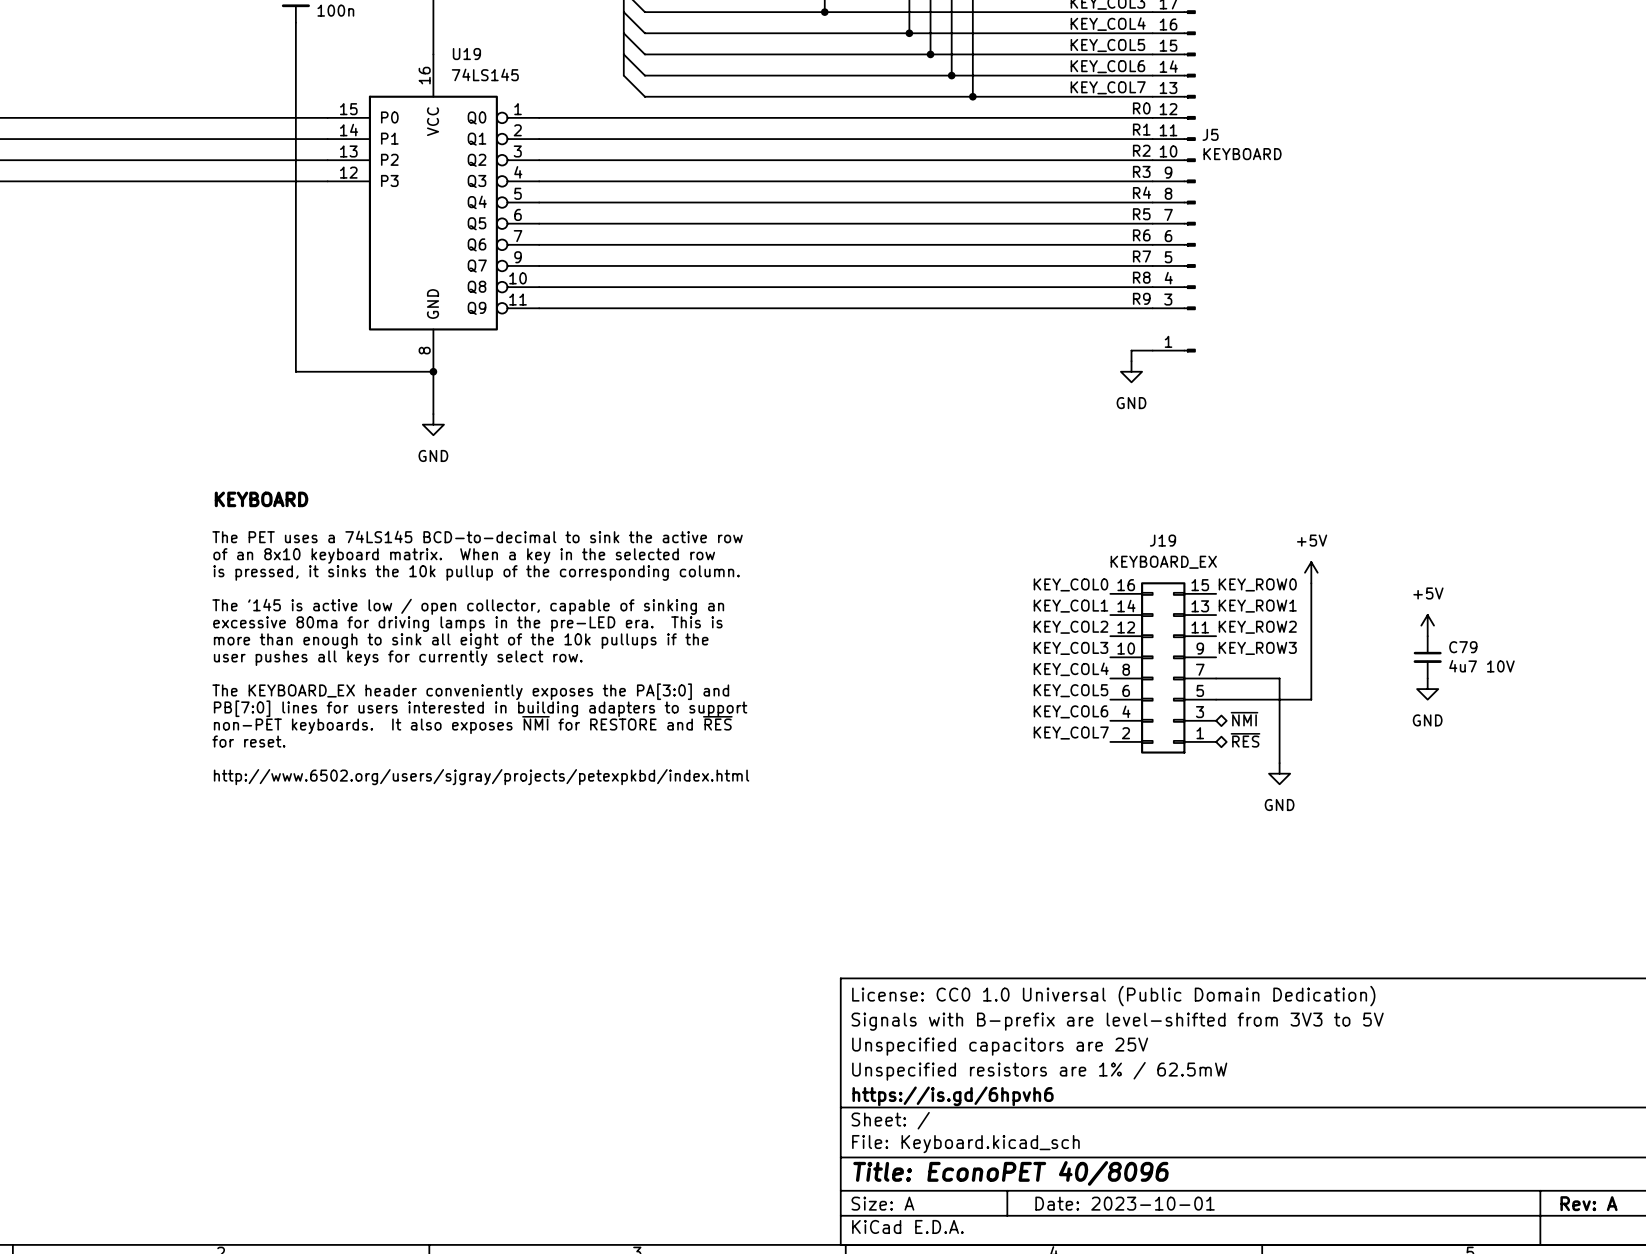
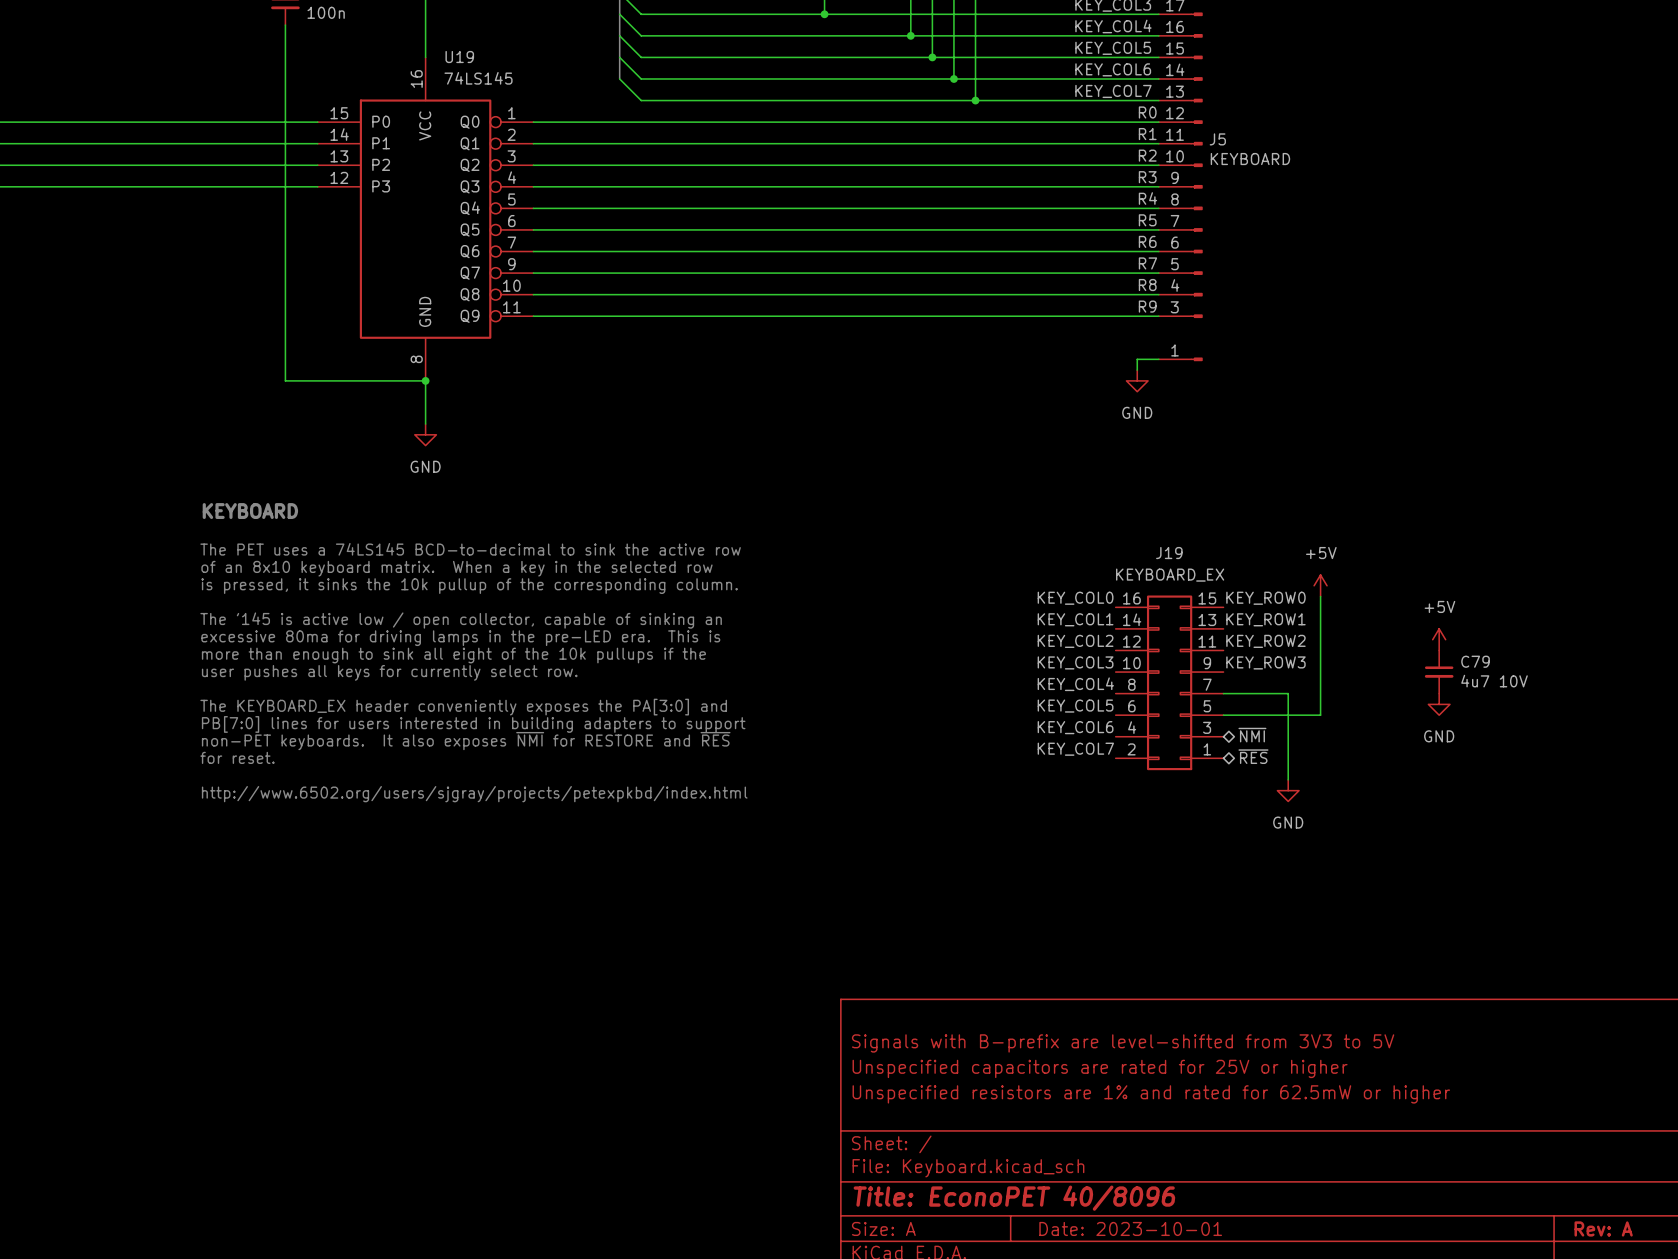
title block: License: CC0 1.0 Universal (Public Domain Dedication) (1113, 996) -> none
title block: Unspecified capacitors are 25V (1000, 1046) -> Unspecified capacitors are rated for 25V or higher (1100, 1068)
title block: Unspecified resistors are 1% / 62.5mW (1039, 1071) -> Unspecified resistors are 1% and rated for 62.5mW or higher (1151, 1094)
title block: https://is.gd/6hpvh6 (953, 1096) -> none

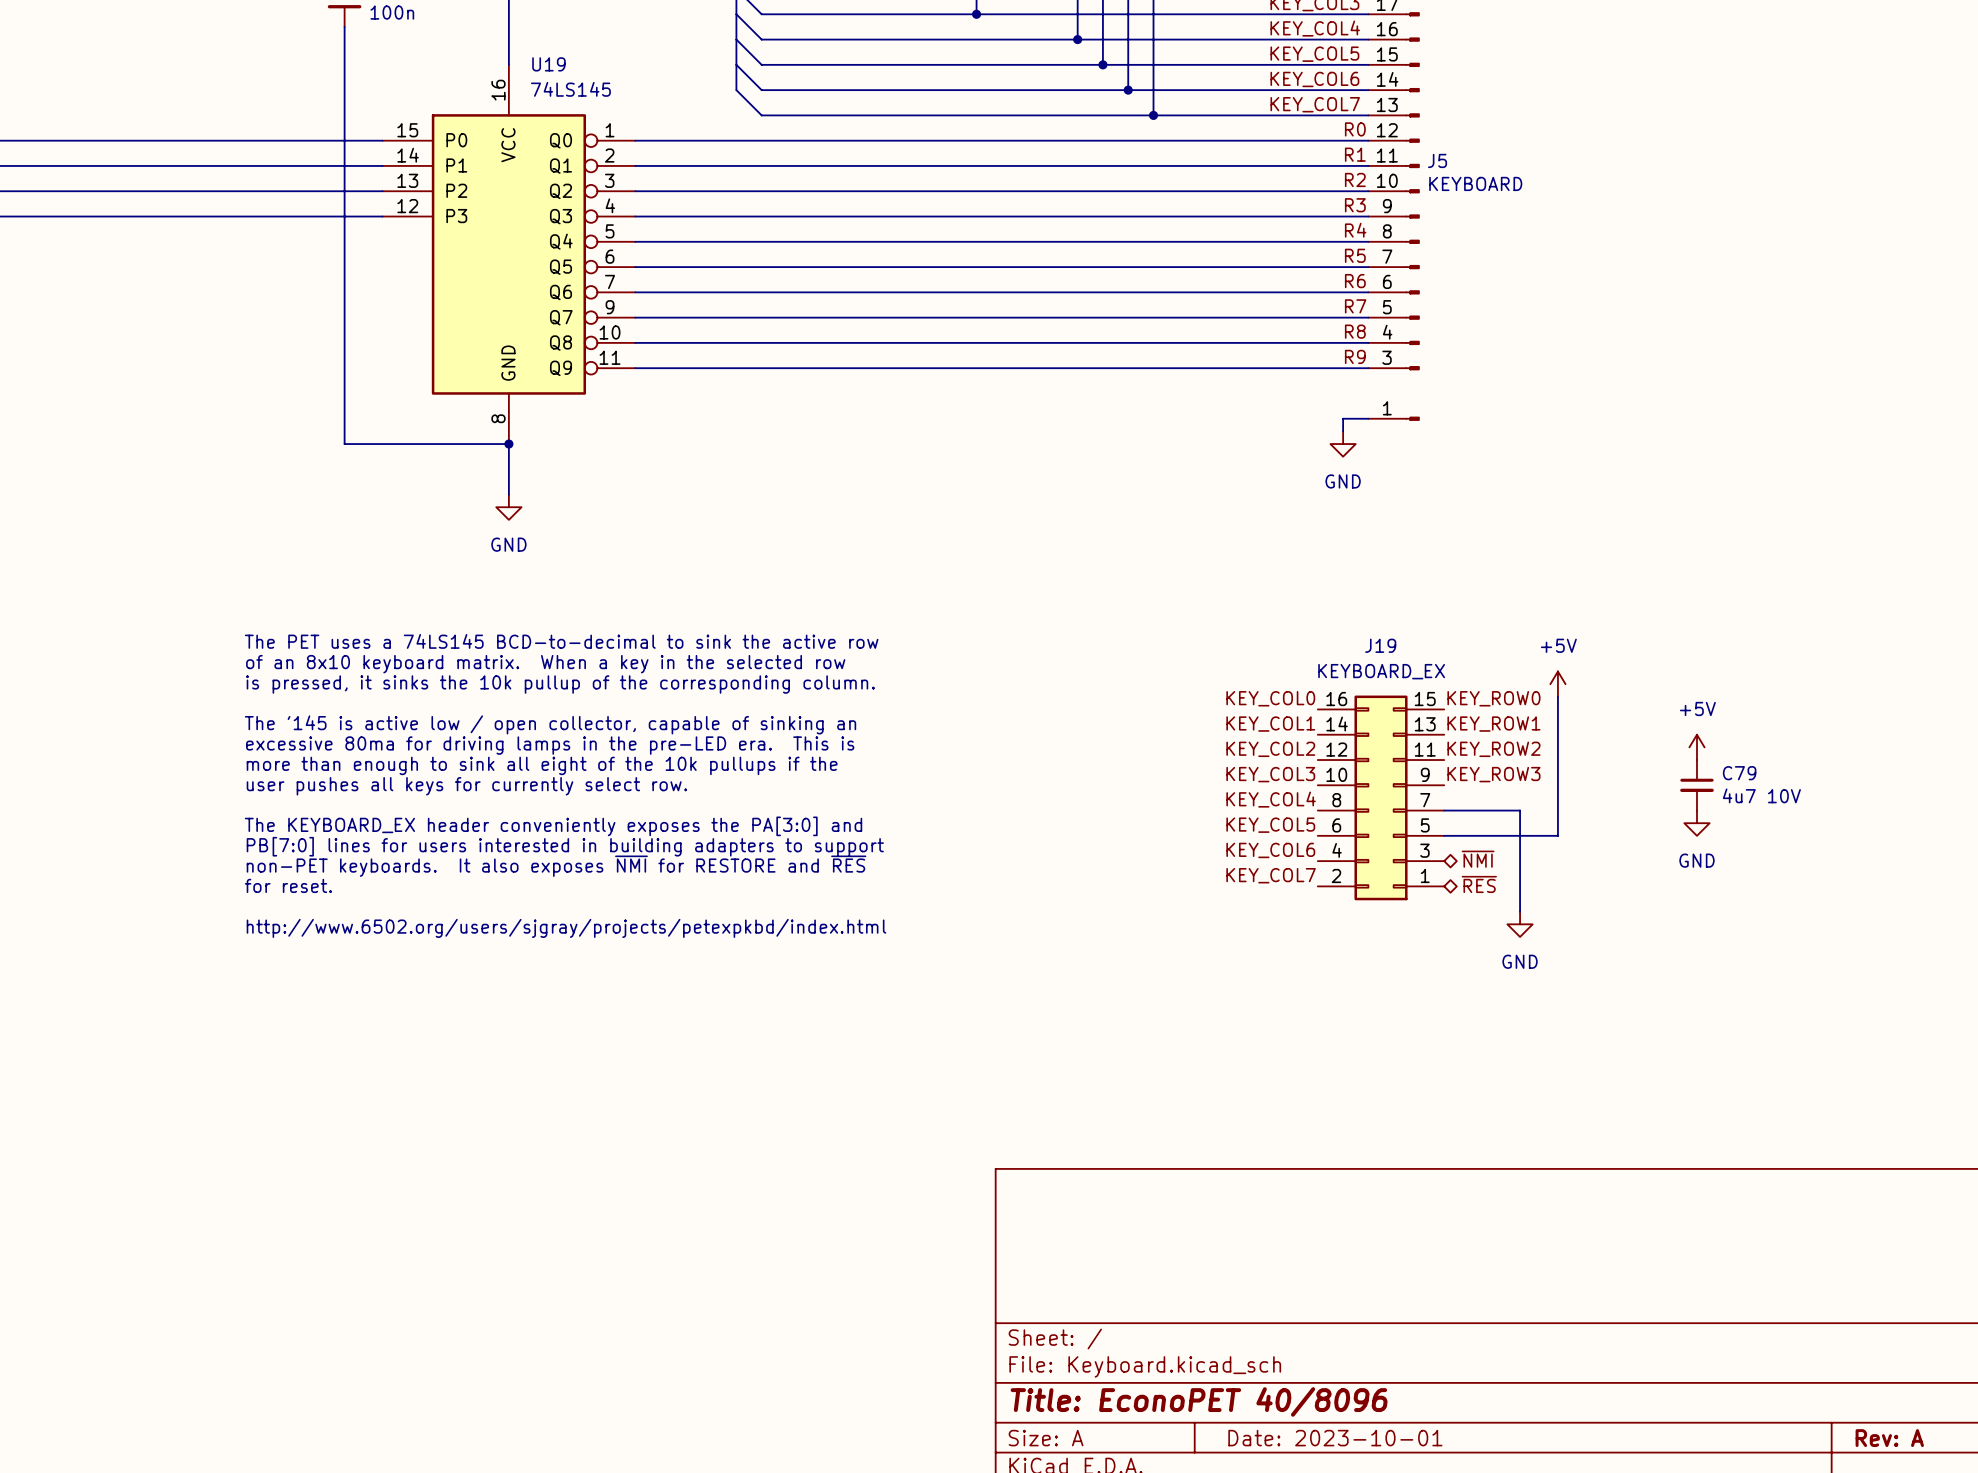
text: KEYBOARD (250, 511) -> none
title block: Signals with B-prefix are level-shifted from 3V3 to 5V (1123, 1043) -> none
title block: Unspecified capacitors are rated for 25V or higher (1100, 1068) -> none
title block: Unspecified resistors are 1% and rated for 62.5mW or higher (1151, 1094) -> none

